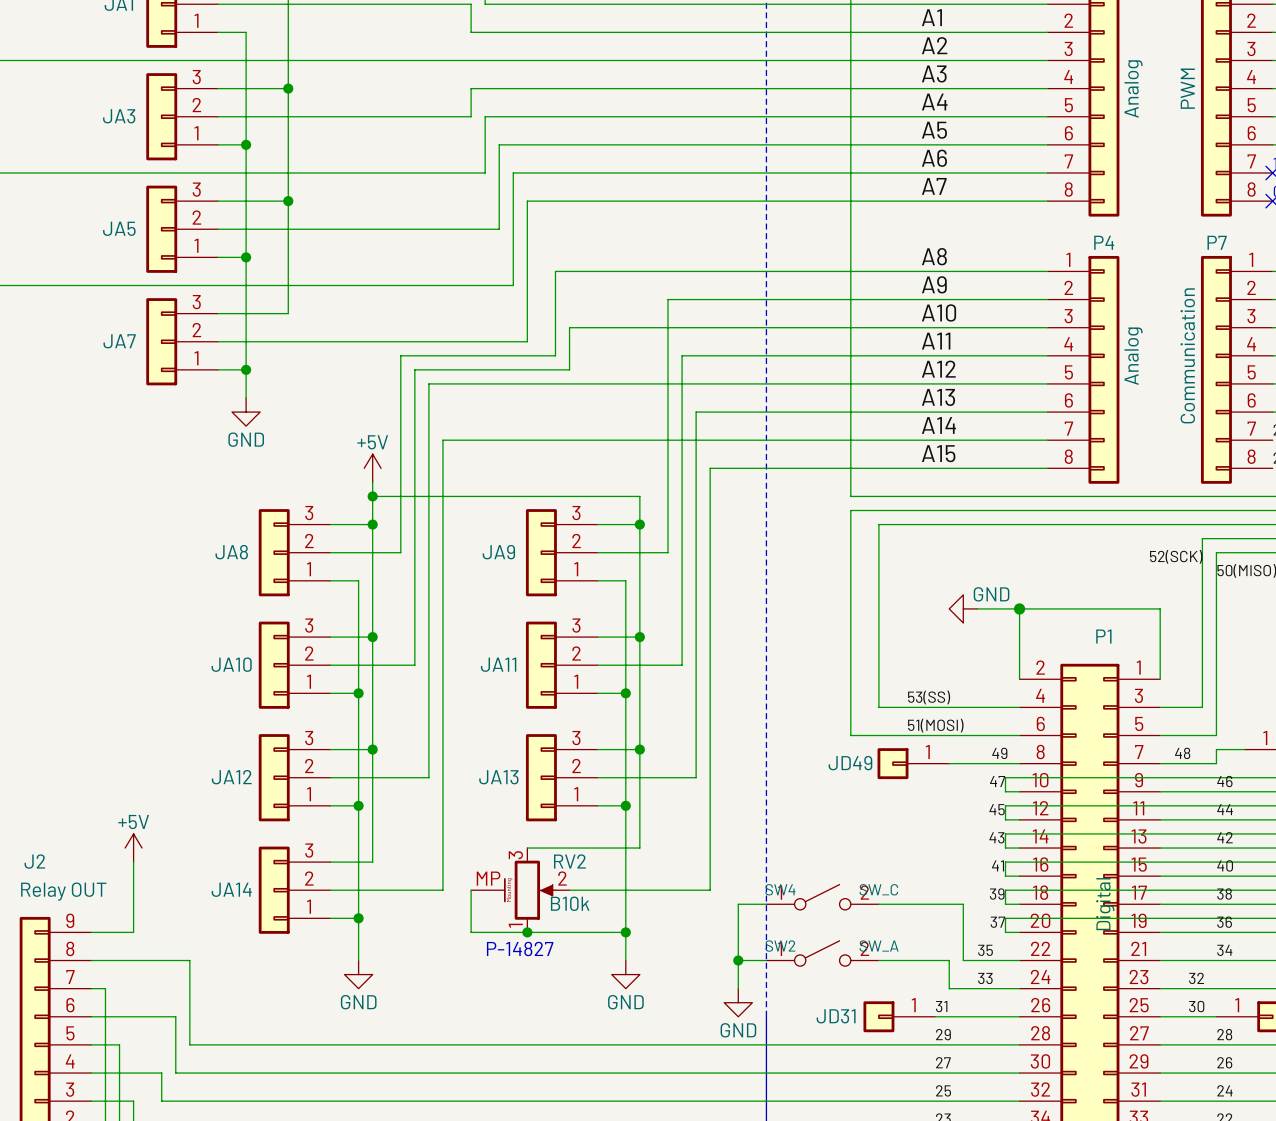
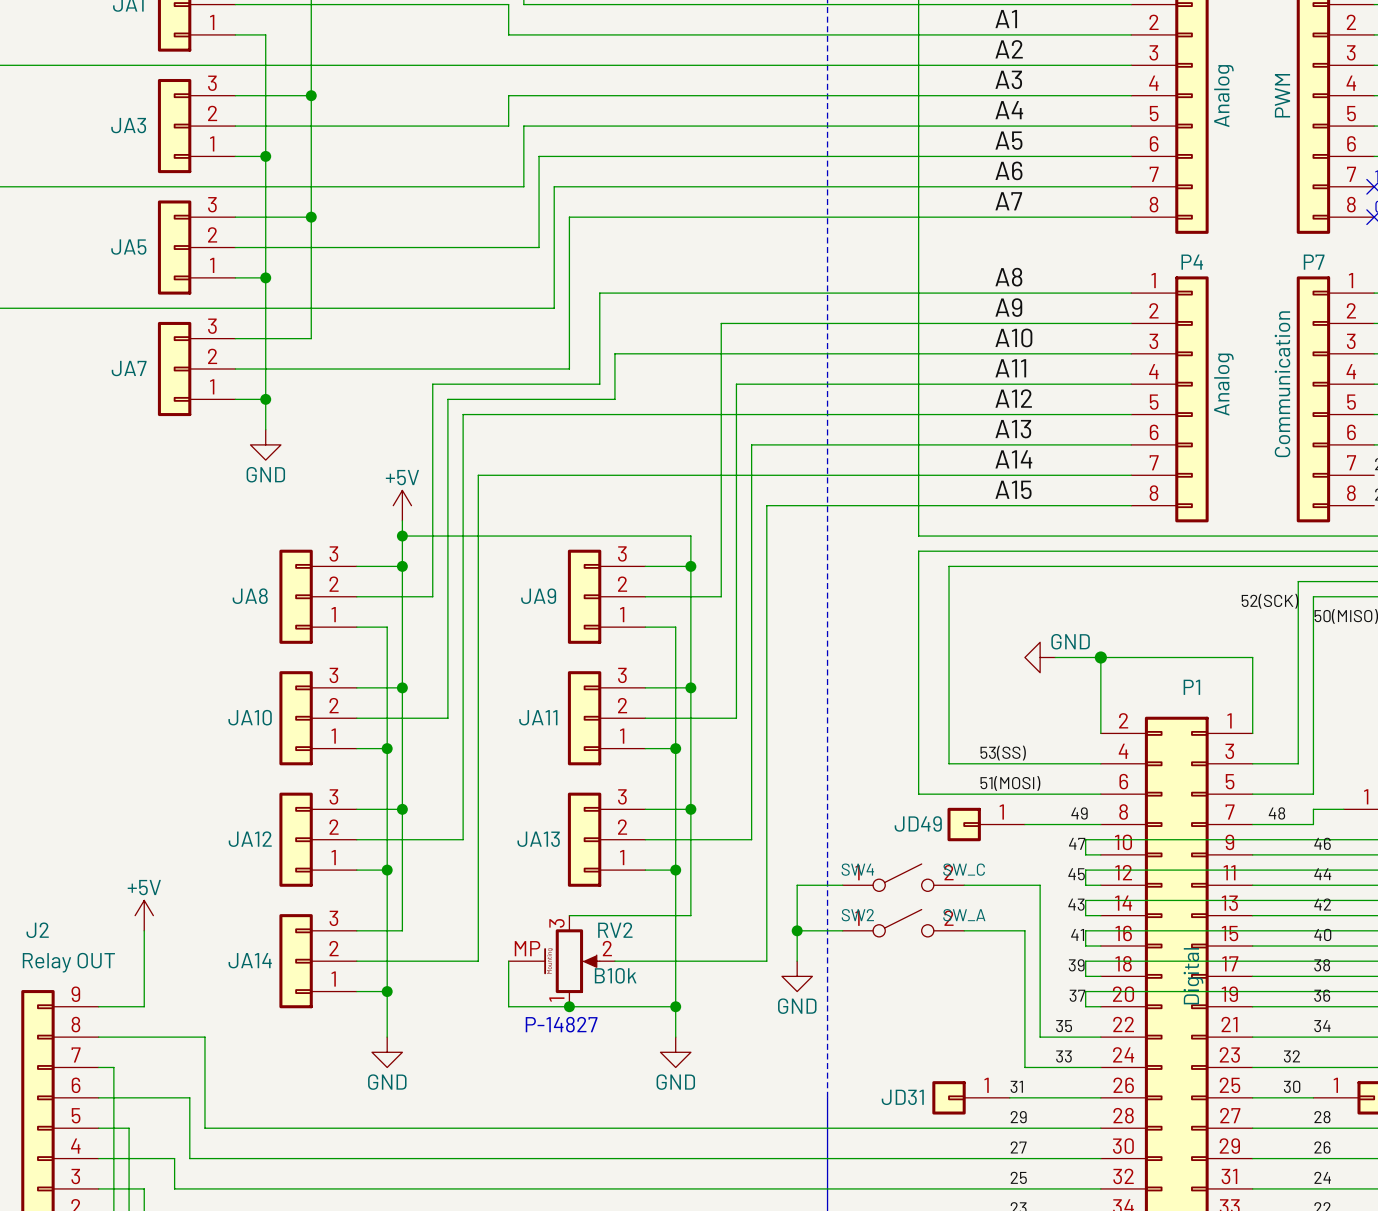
wire: none -> (842, 885) (797, 885) (797, 961)
wire: none -> (797, 930) (842, 930)
junction: none -> (797, 930)
SW4 position: (822, 897) -> (903, 877)
wire: (766, 904) (738, 904) (738, 988) -> none
wire: (878, 904) (963, 904) -> (964, 885) (1040, 885) (1040, 976)
SW2 position: (822, 953) -> (903, 923)
wire: (738, 960) (766, 960) -> none
junction: (738, 960) -> none
wire: (878, 960) (949, 960) -> (964, 930) (1024, 930) (1024, 1037)
power symbol position: GND (738, 1002) -> GND (797, 976)

